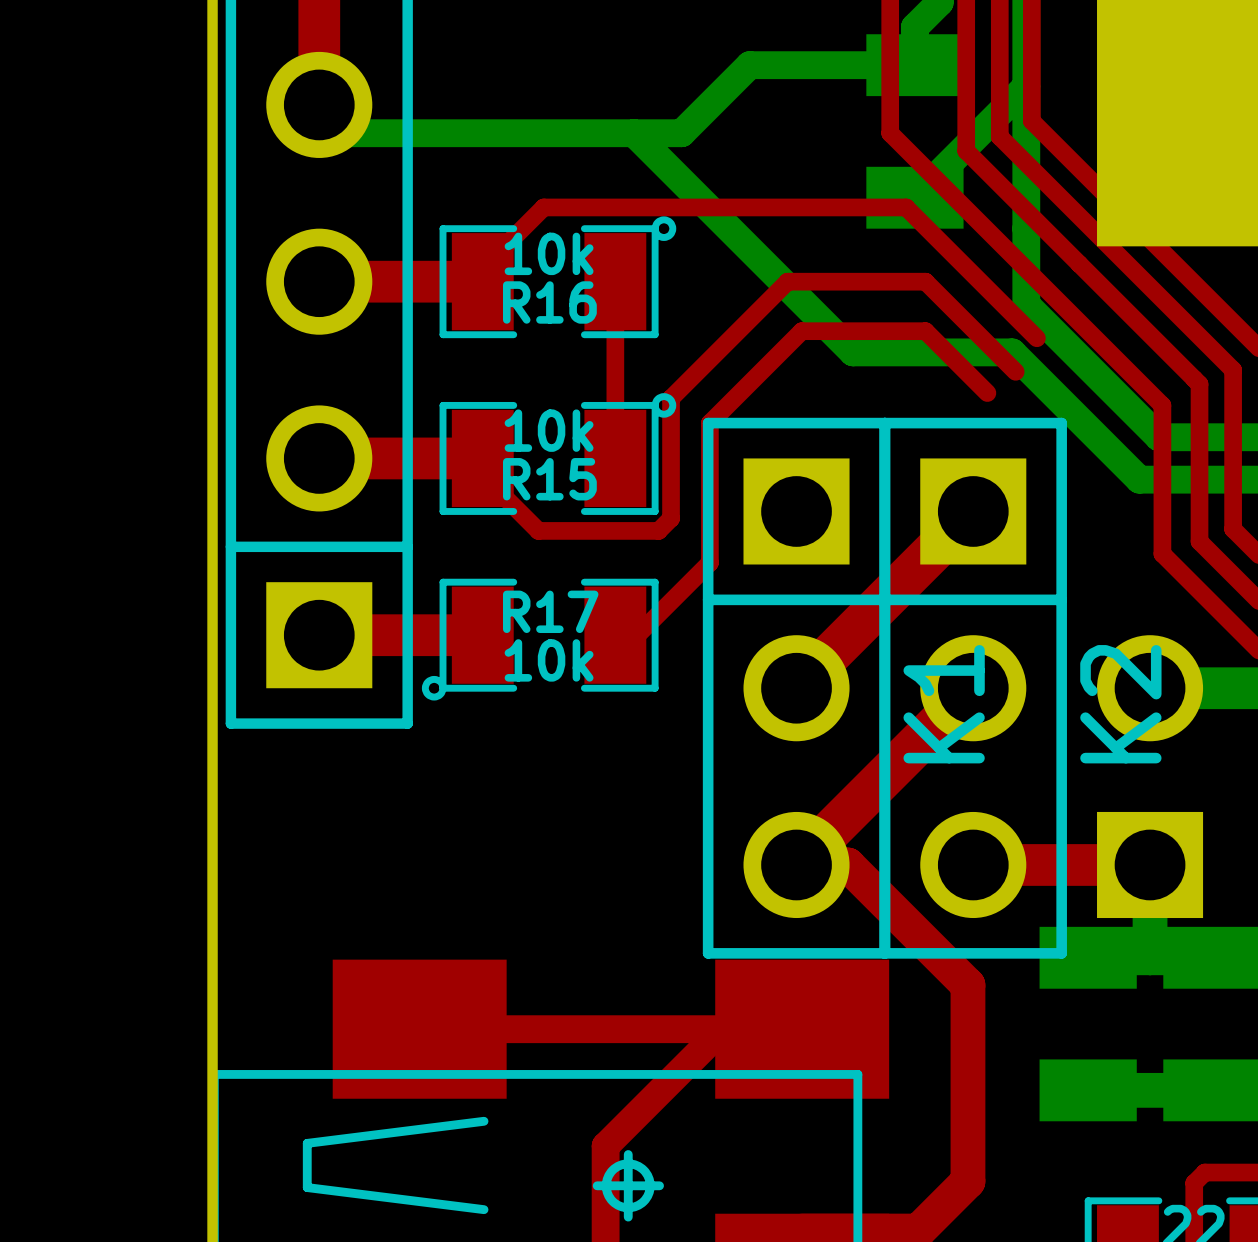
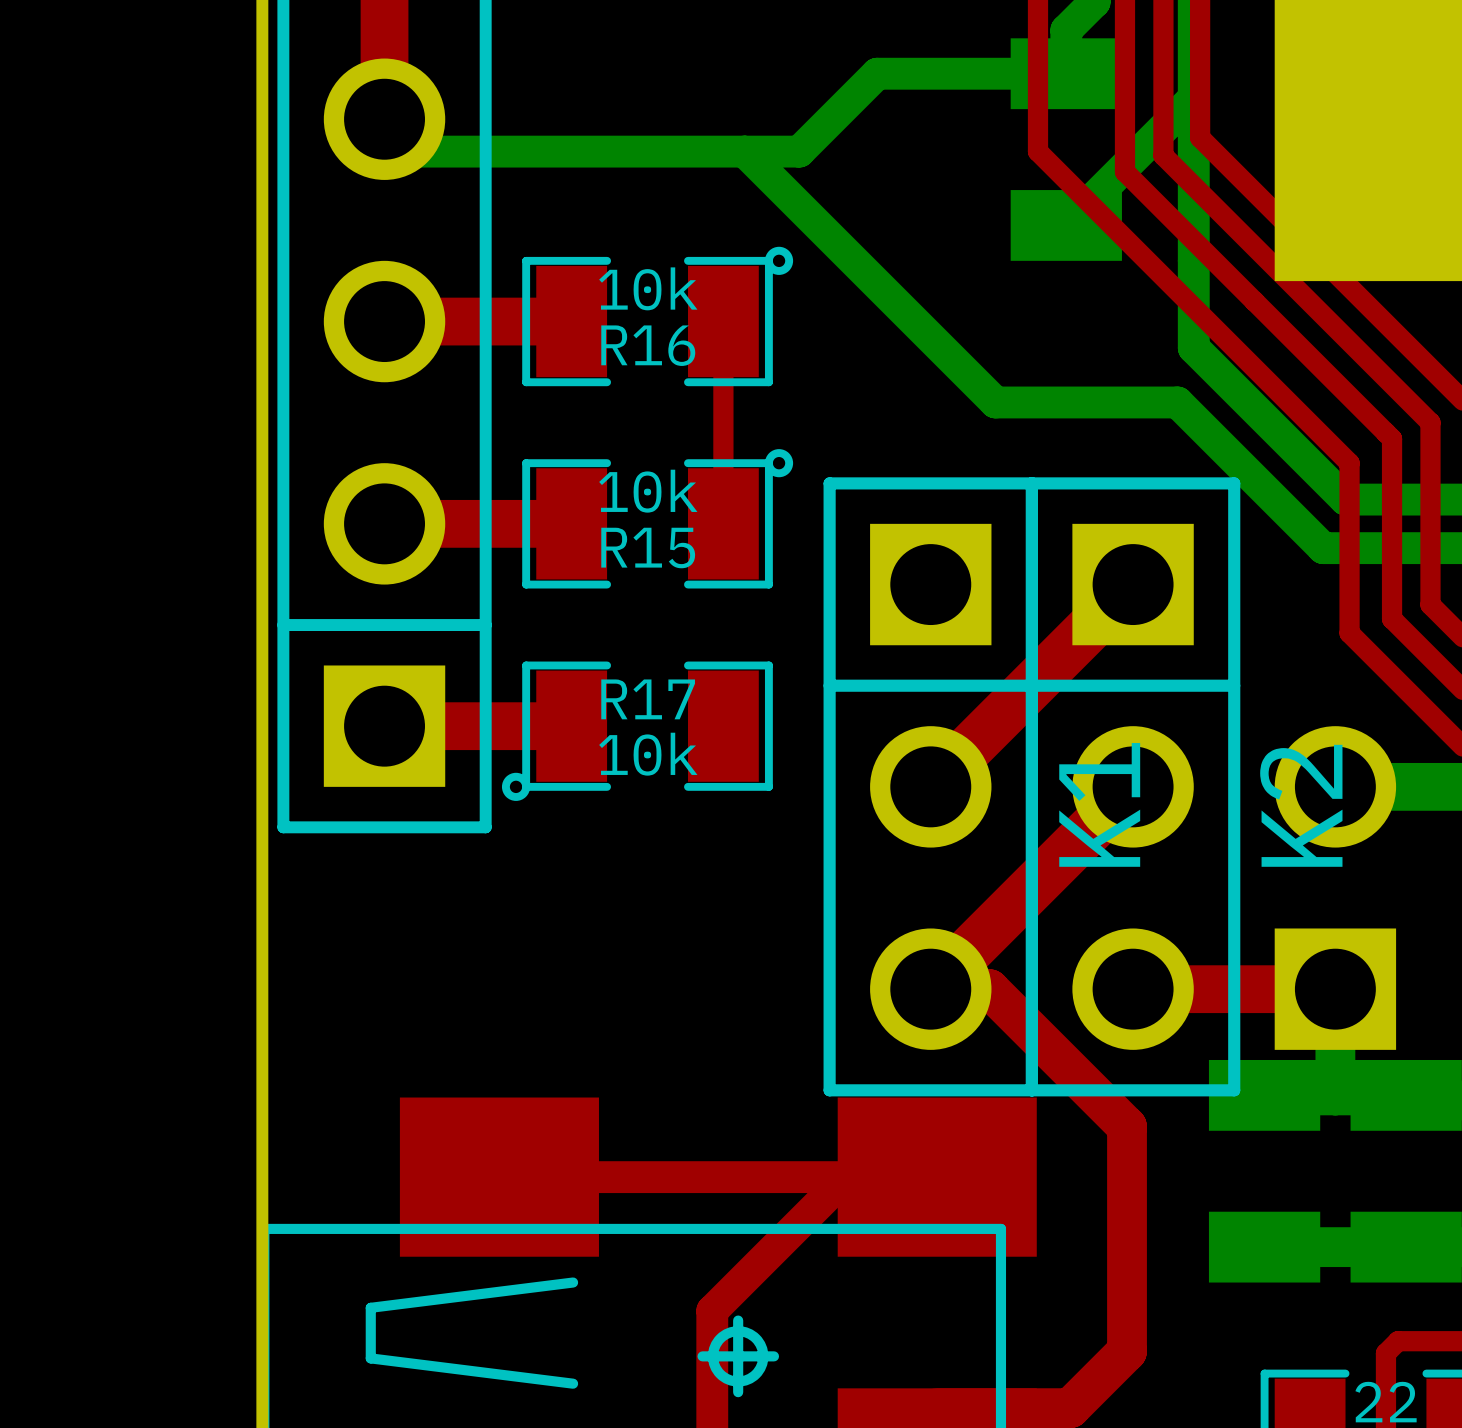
top track: (482, 281) (482, 268) (543, 207) (906, 207) (1036, 338) -> none
top track: (1015, 371) (925, 281) (787, 281) (671, 398) (671, 518) (658, 530) (538, 530) (482, 475) (482, 458) -> none
top track: (987, 393) (925, 331) (801, 331) (709, 423) (709, 562) (637, 635) (615, 635) -> none

